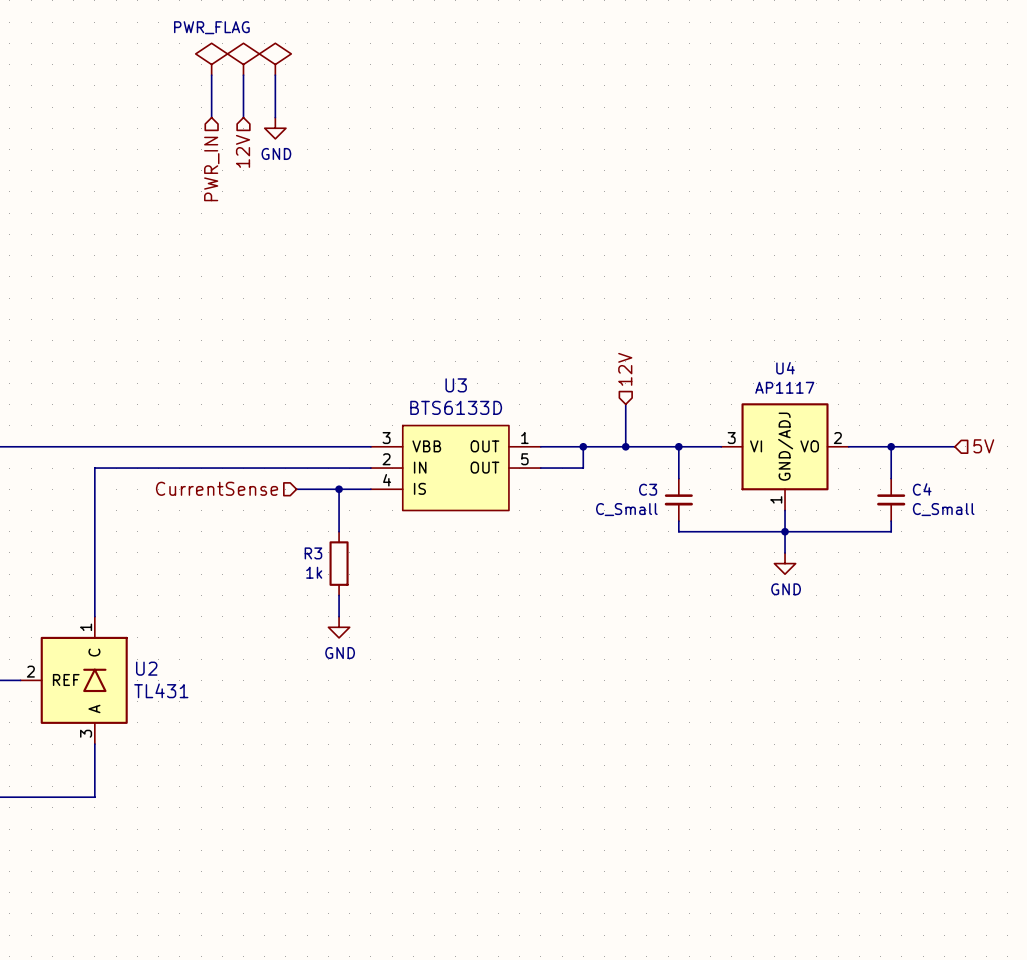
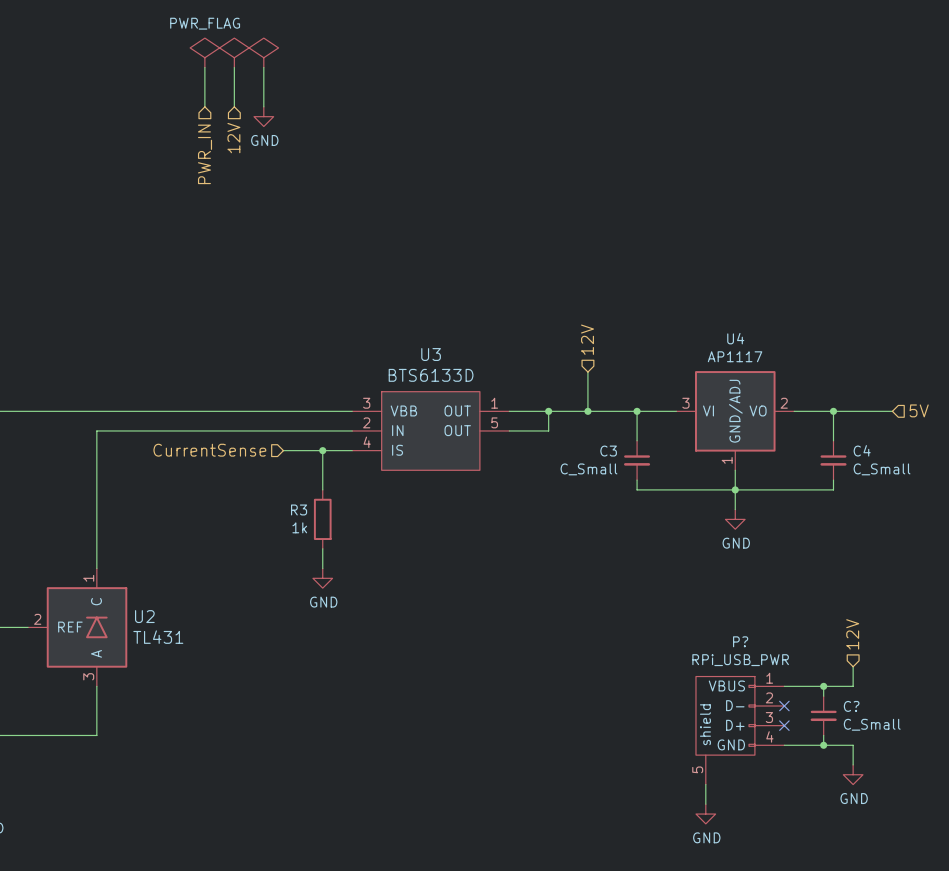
hierarchical label: none -> 12V (852, 634)
wire: none -> (853, 666) (853, 686) (784, 686)
wire: none -> (823, 686) (823, 696)
junction: none -> (823, 686)
no-connect mark: none -> (784, 706)
C?: none -> C_Small (823, 715)
no-connect mark: none -> (784, 725)
P?: none -> RPi_USB_PWR (740, 730)
wire: none -> (823, 735) (823, 745)
wire: none -> (784, 745) (853, 745) (853, 764)
junction: none -> (823, 745)
power symbol: none -> GND (853, 774)
wire: none -> (705, 784) (705, 804)
power symbol: none -> GND (705, 814)

